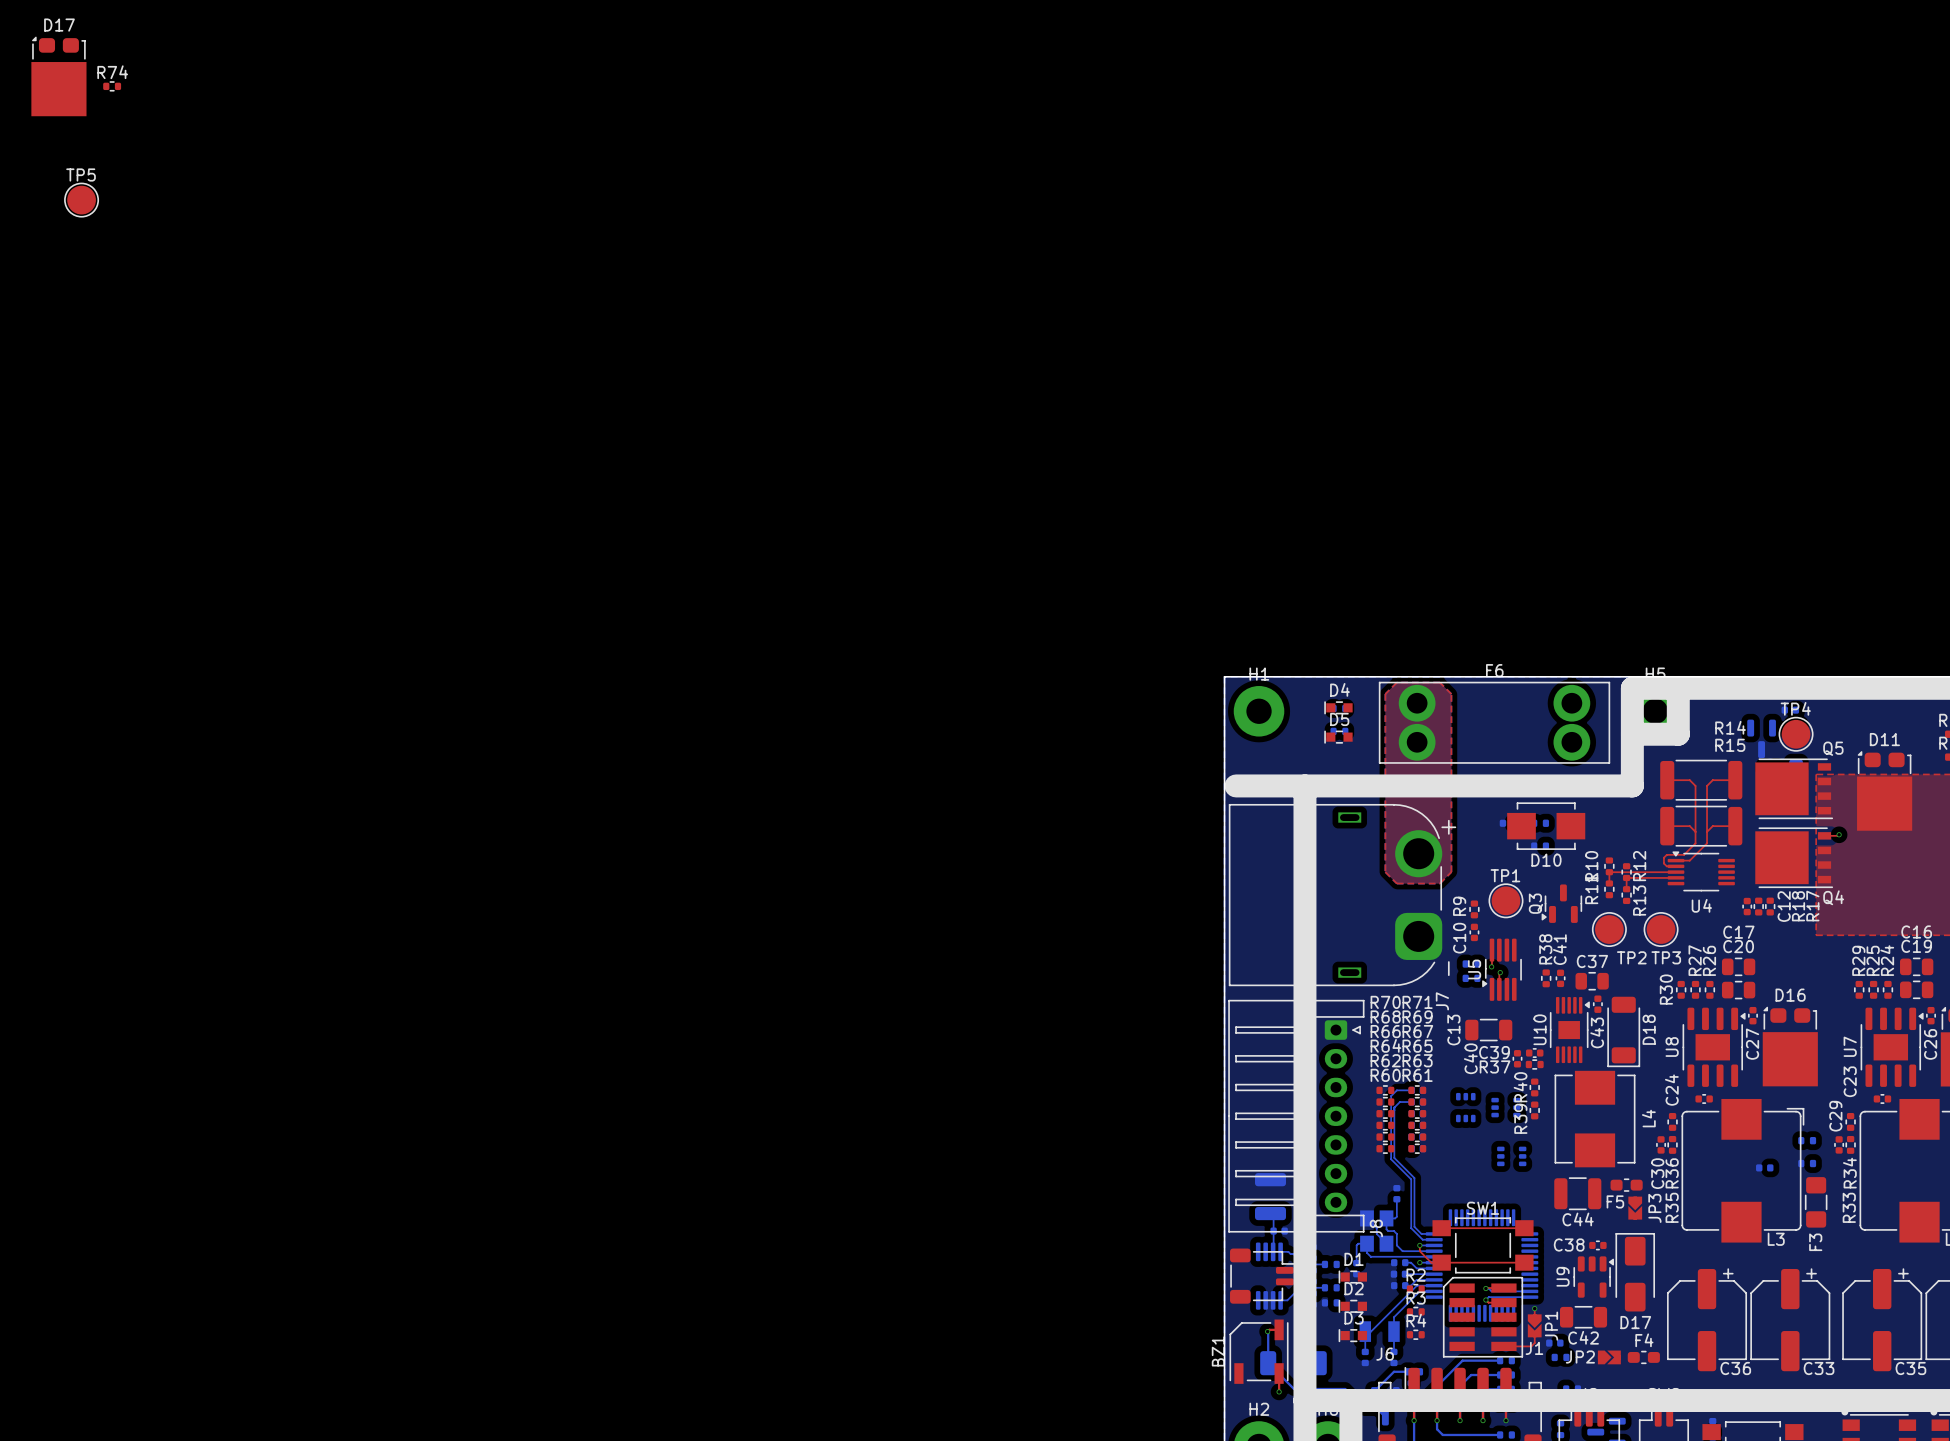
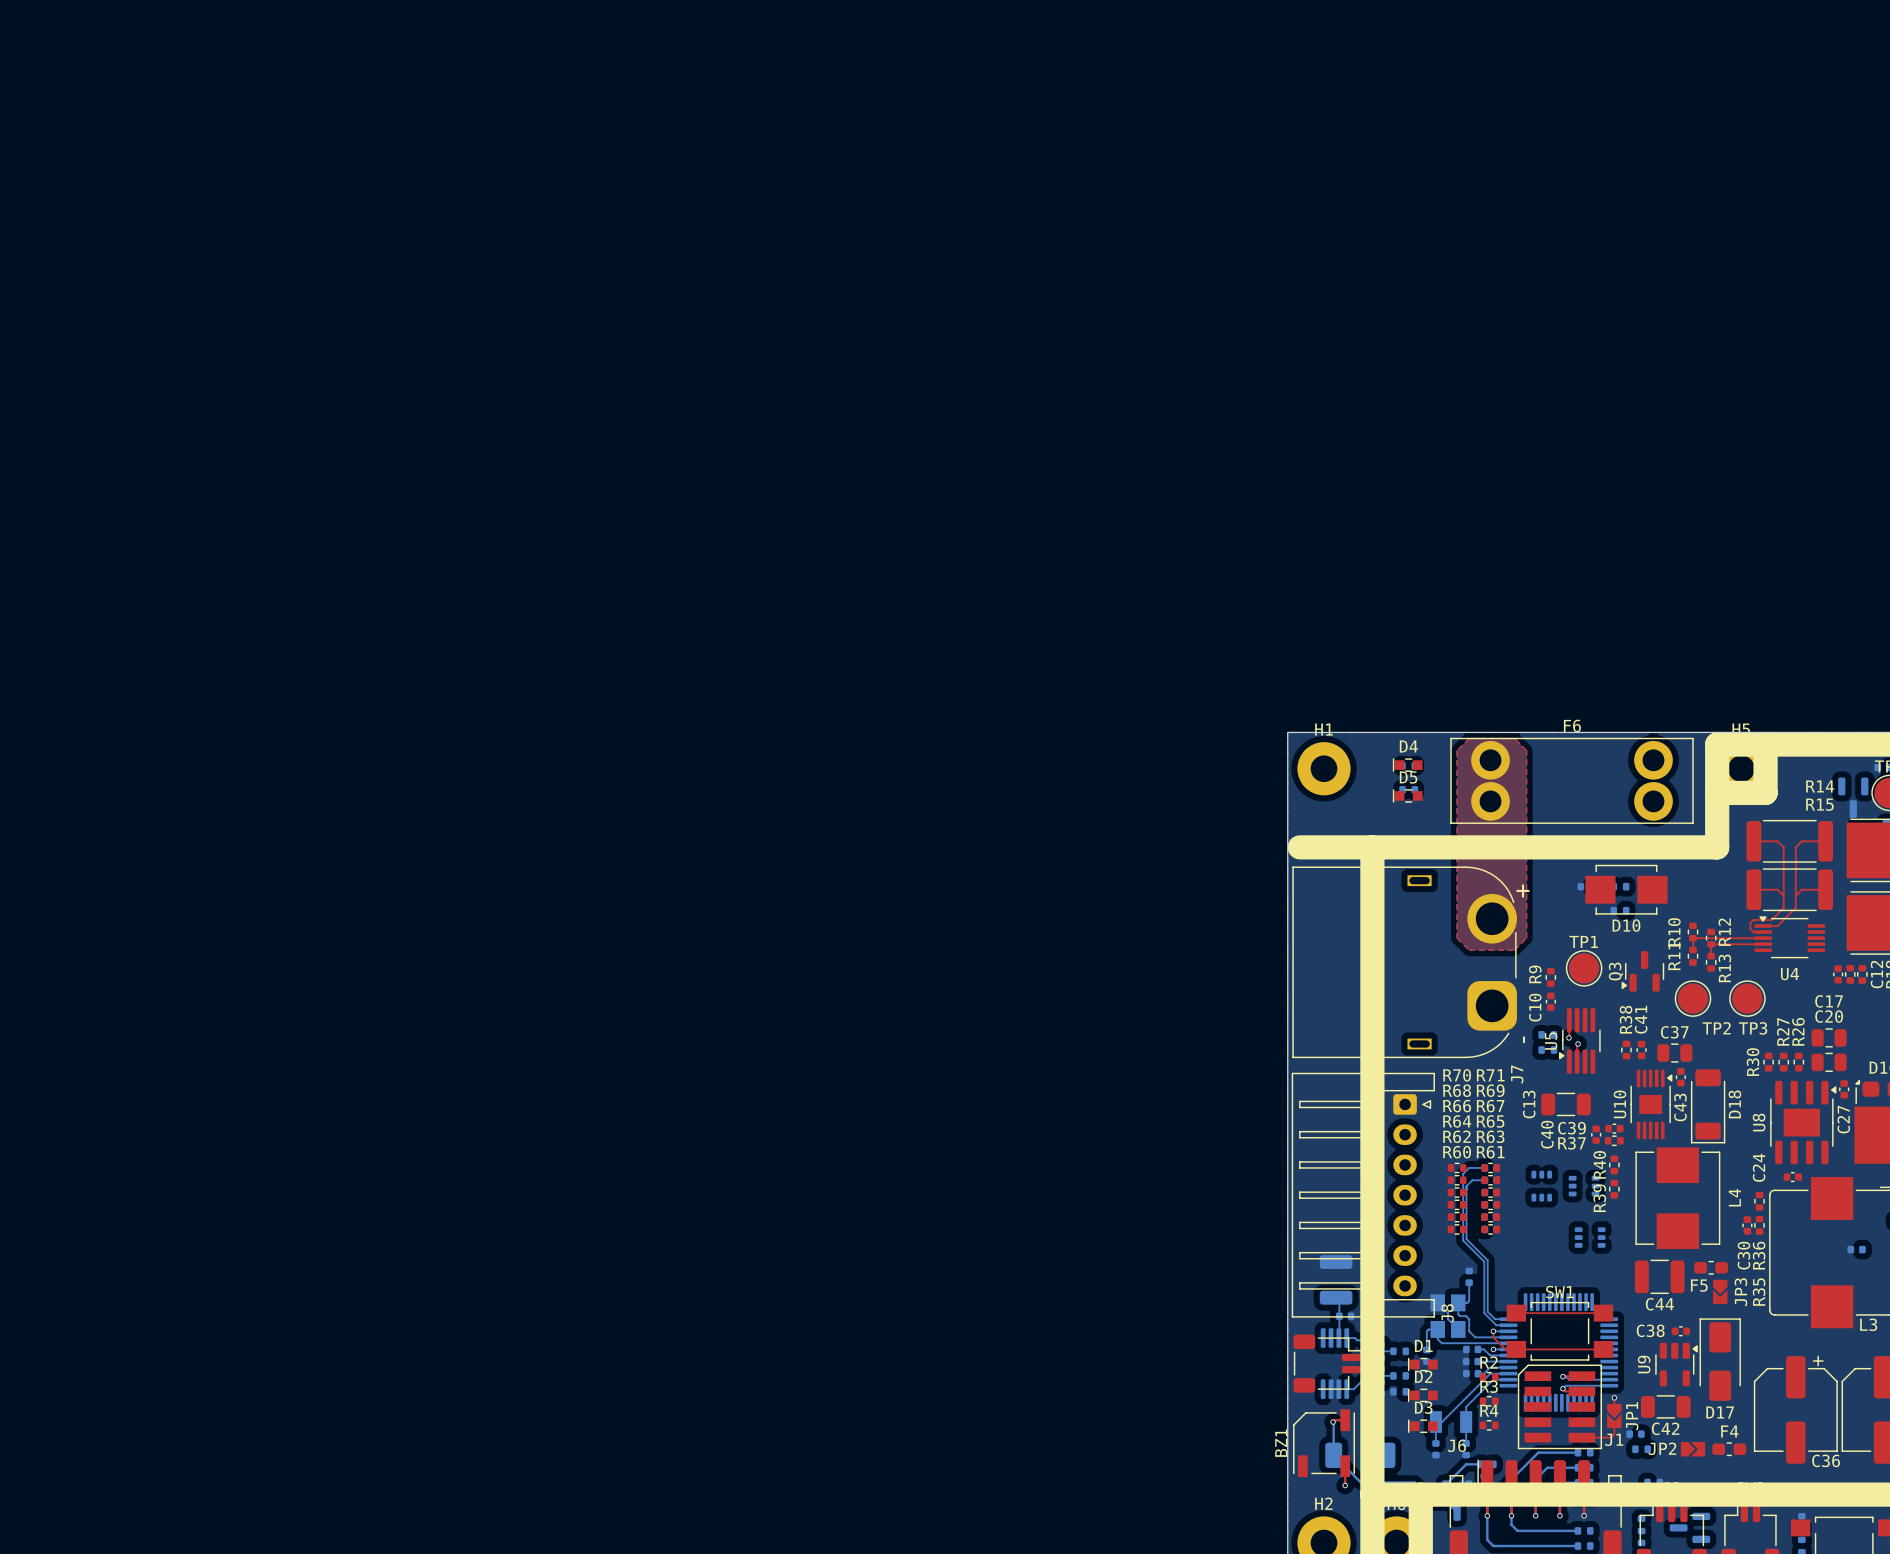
D17: (58, 76) -> none
R74: (112, 86) -> none
TP5: (81, 200) -> none

